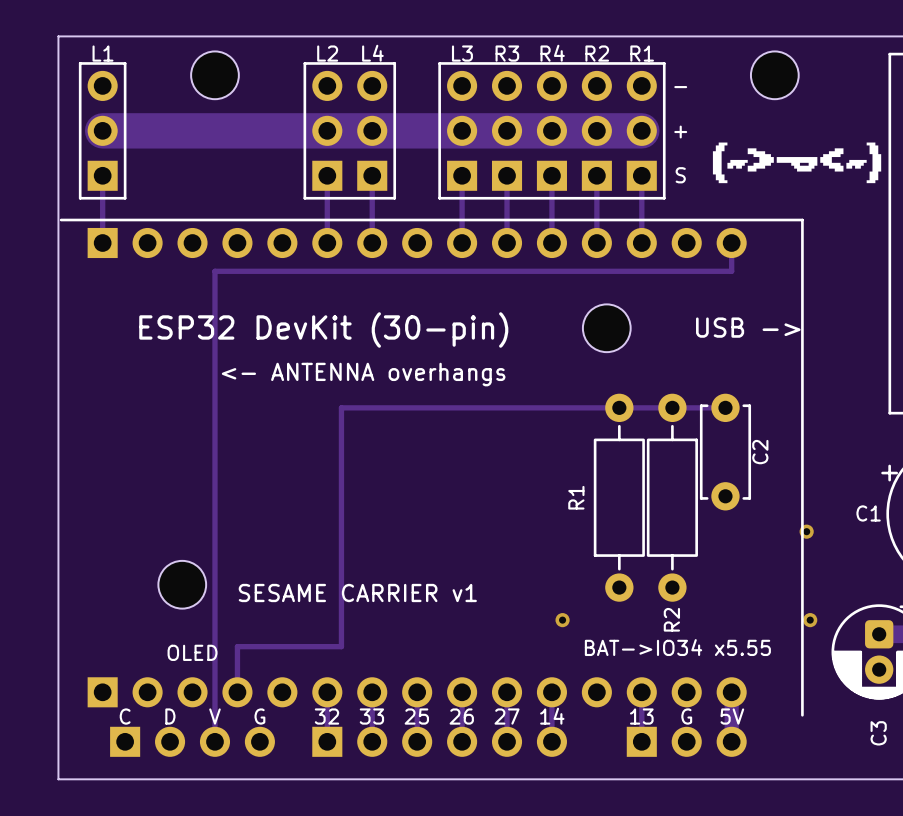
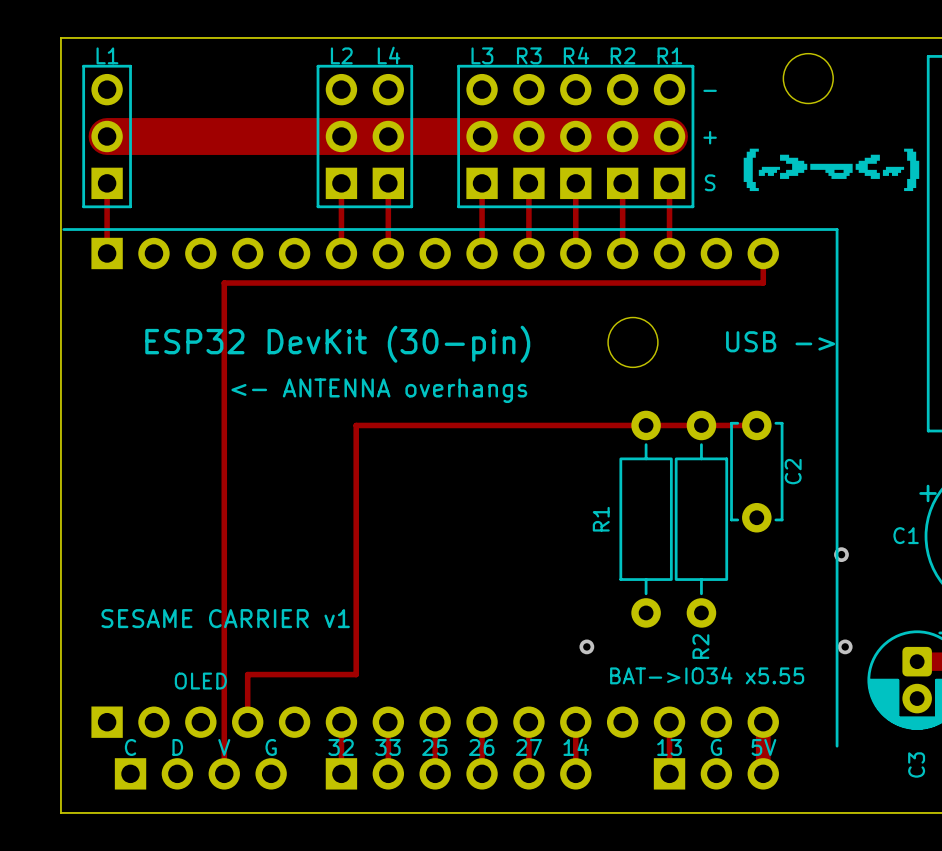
part: (214, 75) -> none
part: (182, 584) -> none
text position: SESAME CARRIER v1 (357, 592) -> SESAME CARRIER v1 (225, 618)

